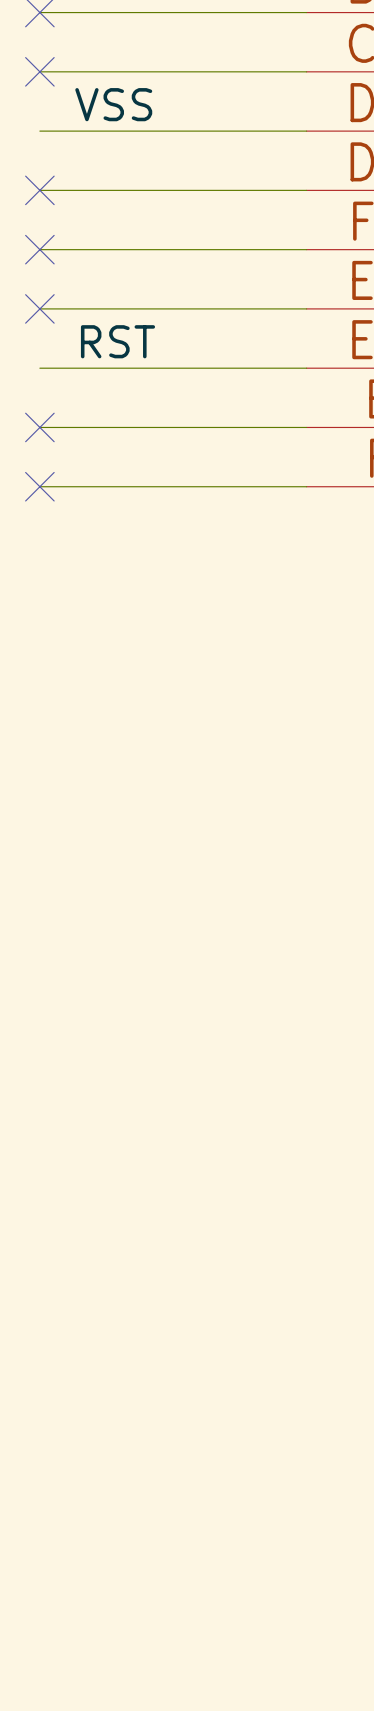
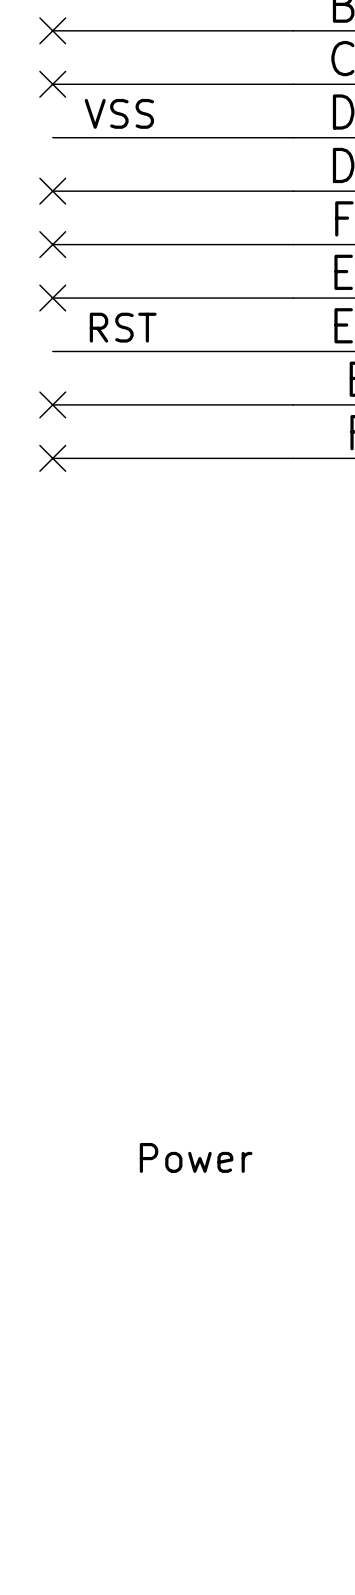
text: none -> Power (196, 1157)

